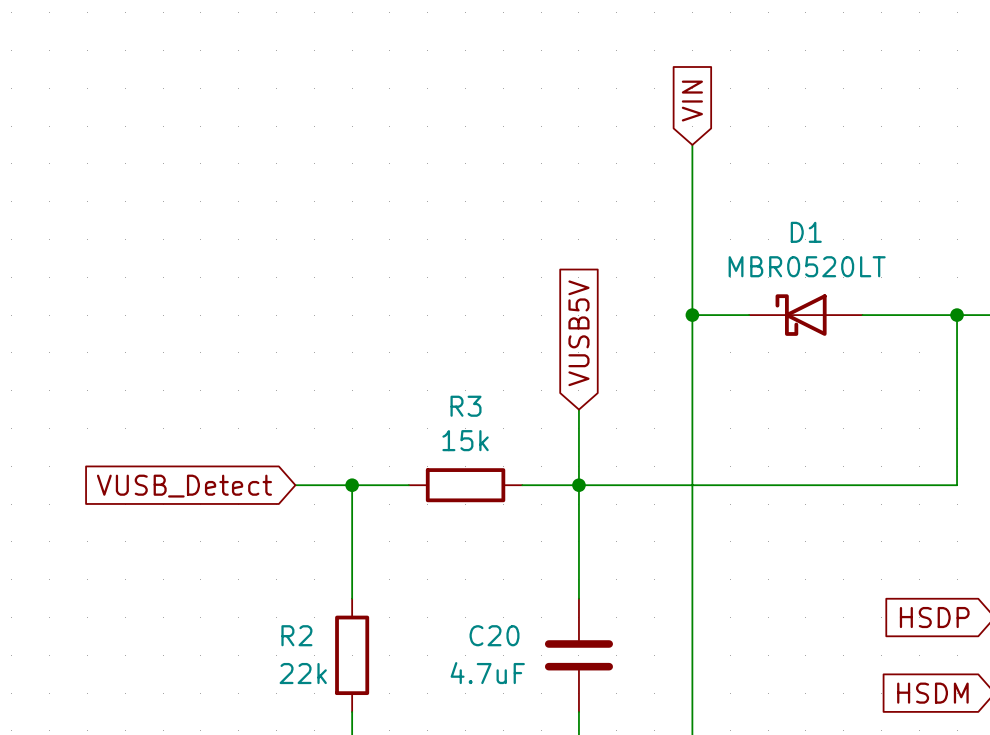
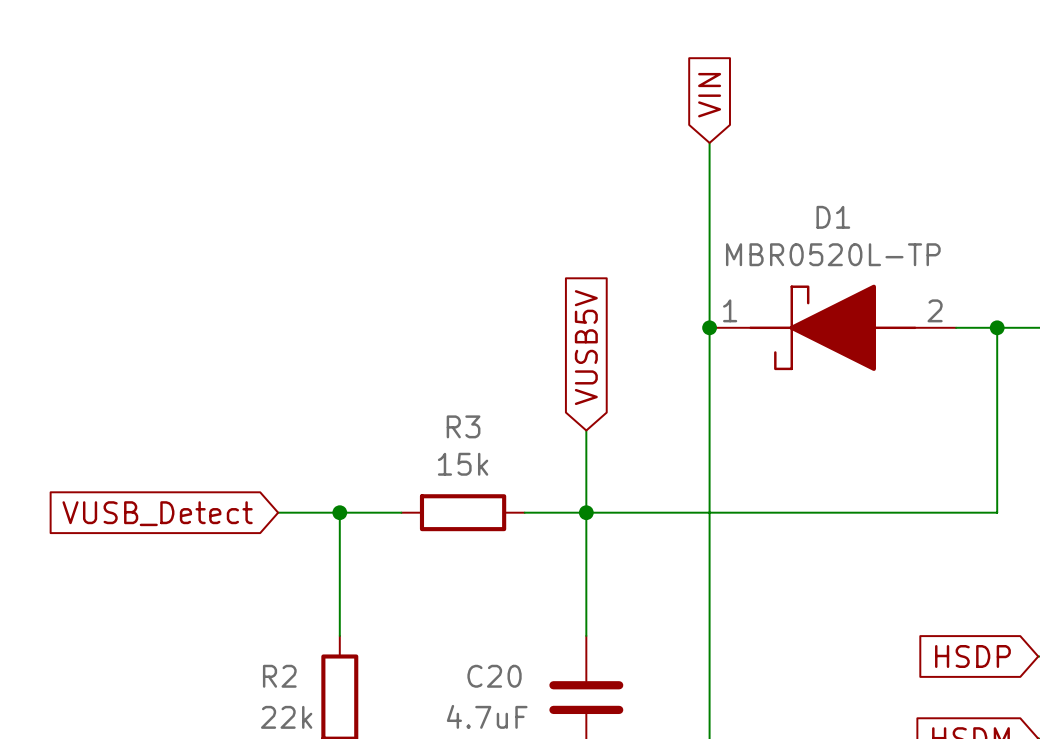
D1 value: MBR0520LT (807, 266) -> MBR0520L-TP (833, 254)
D1 symbol: [749, 294, 863, 336] -> [709, 284, 957, 371]

